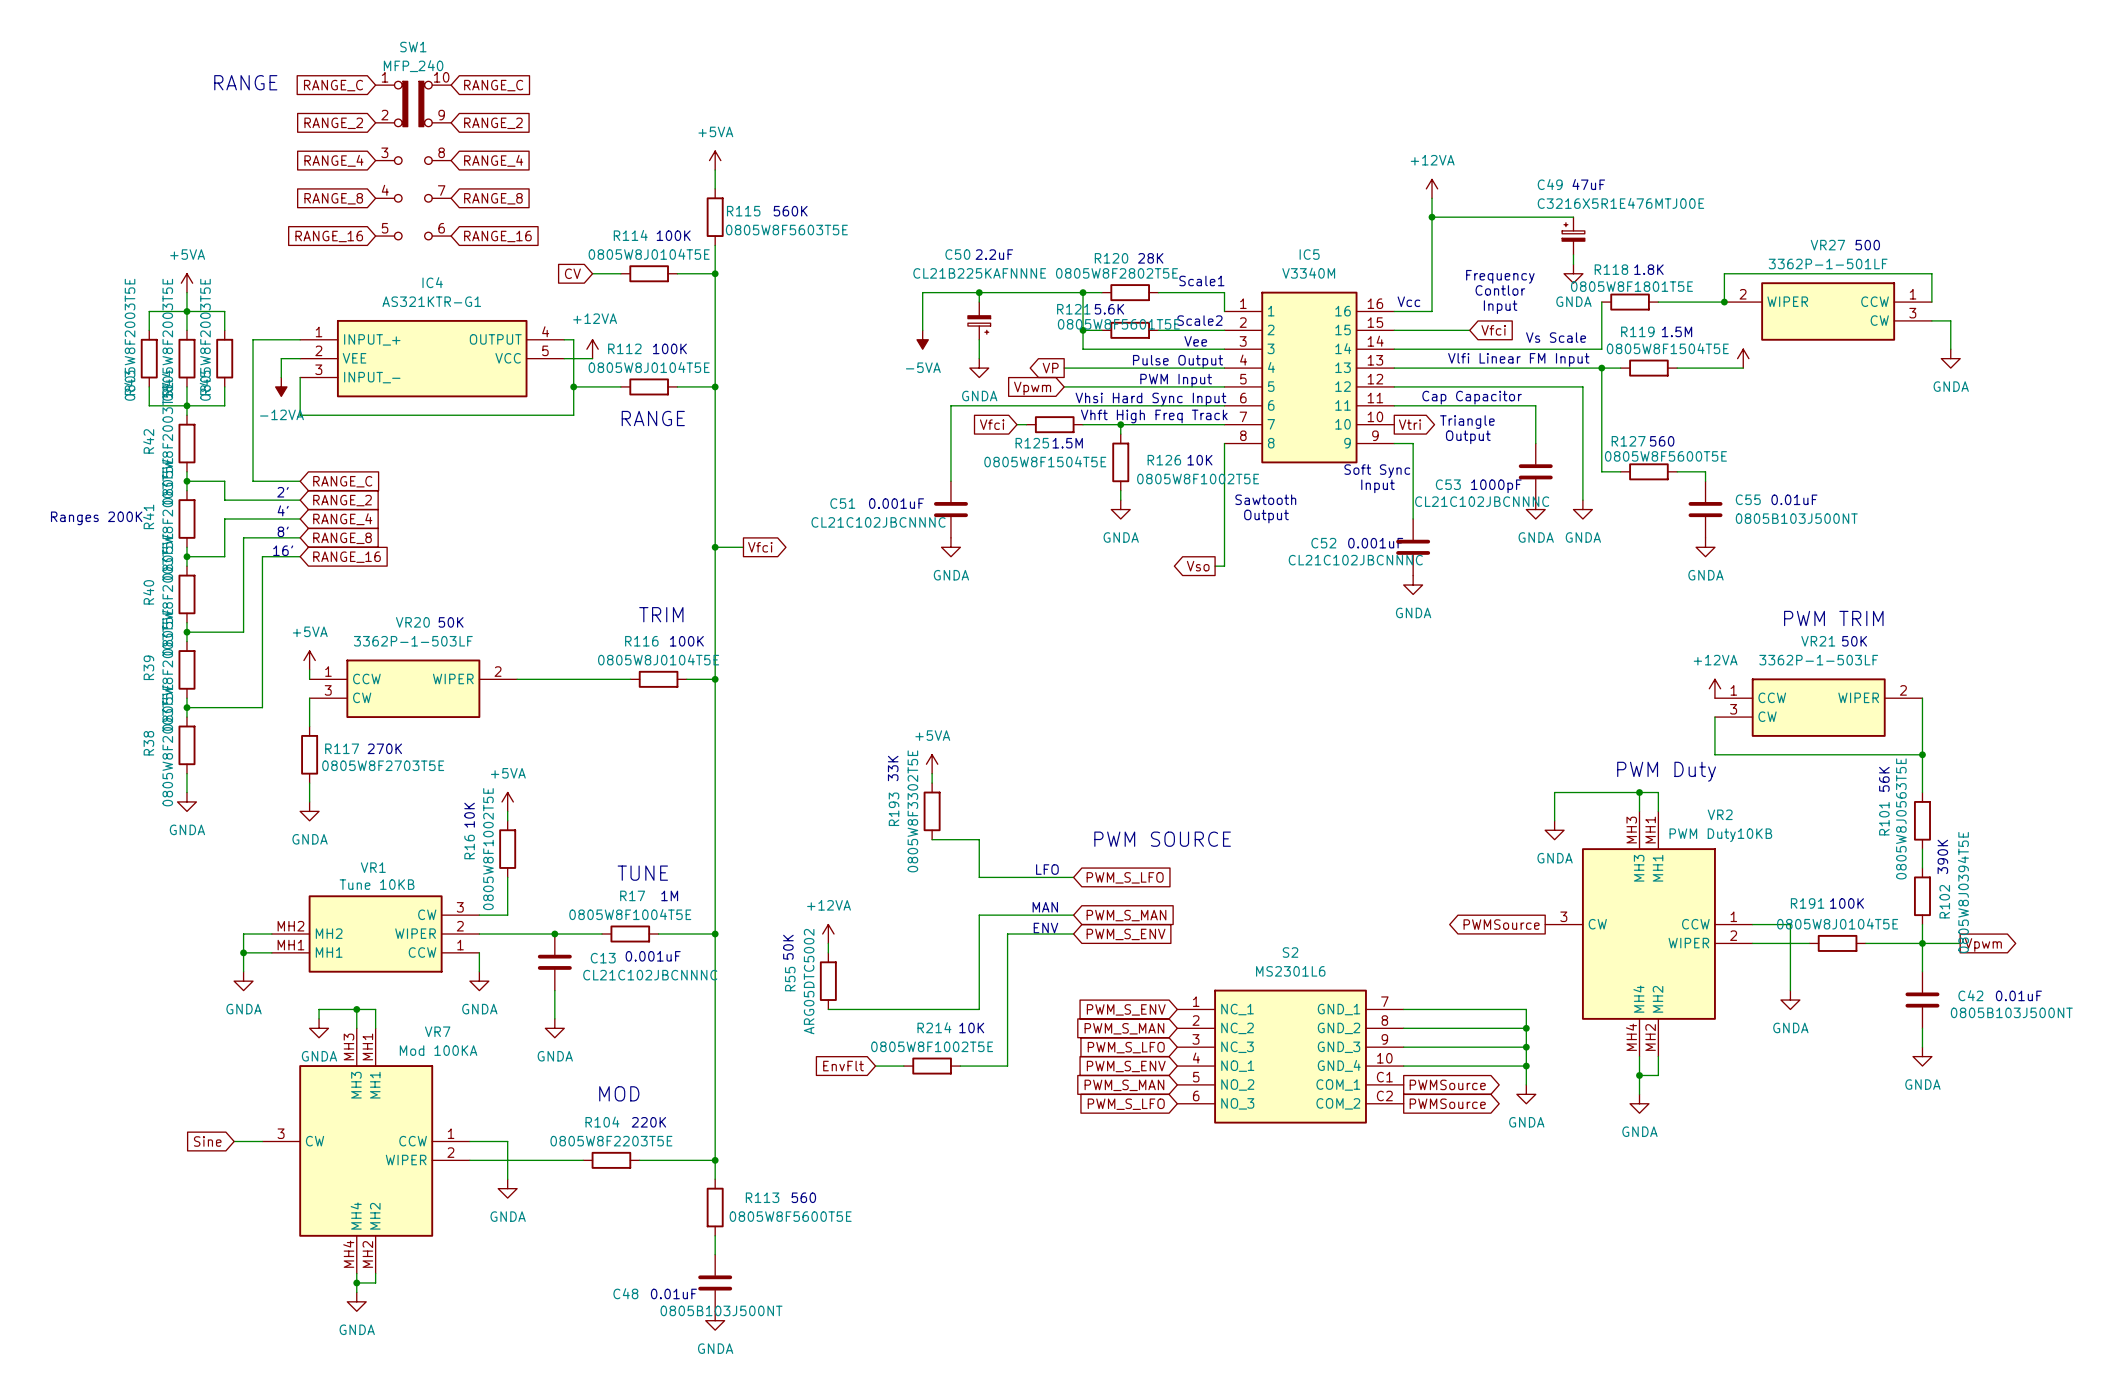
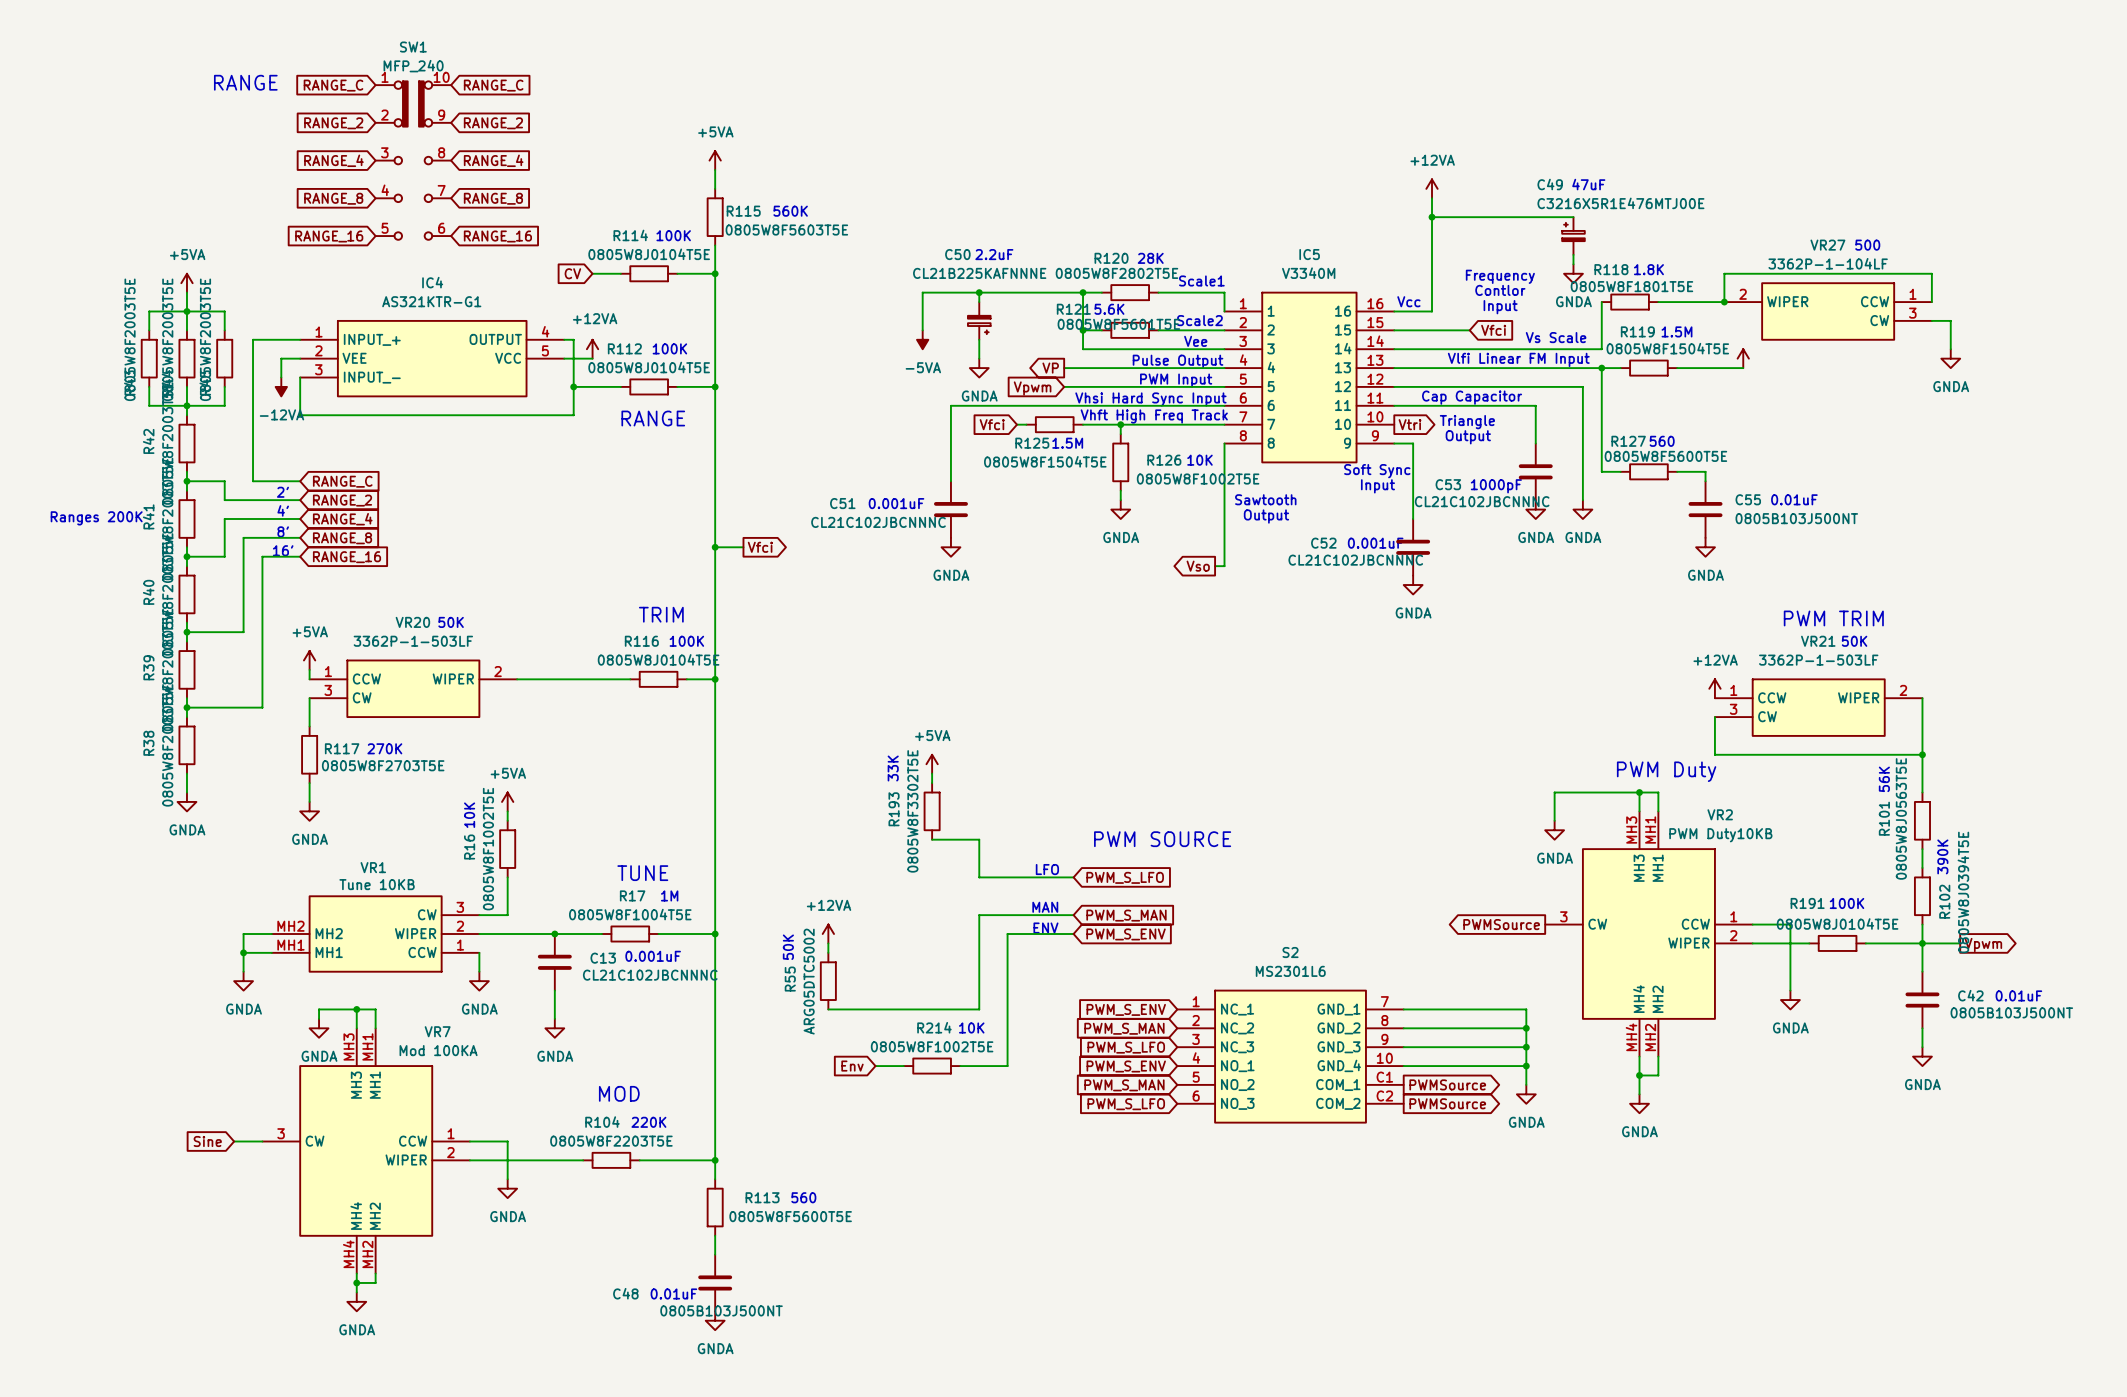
VR27 value: 3362P-1-501LF (1828, 263) -> 3362P-1-104LF (1828, 263)
global label: EnvFlt (843, 1066) -> Env (852, 1066)

